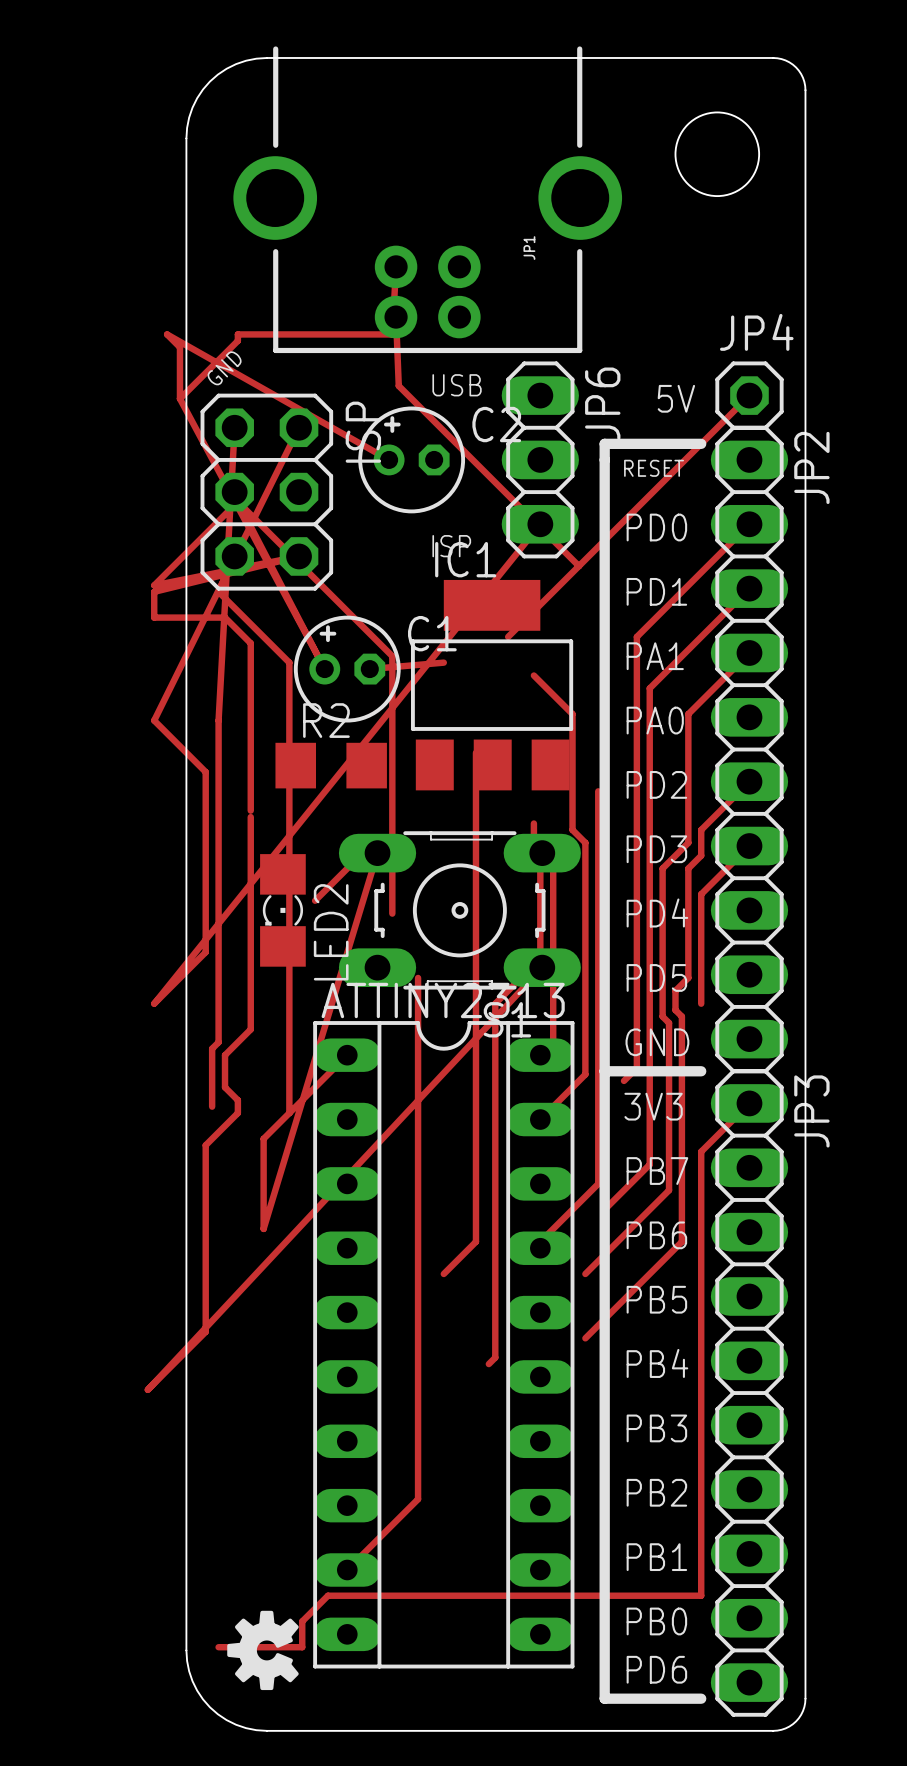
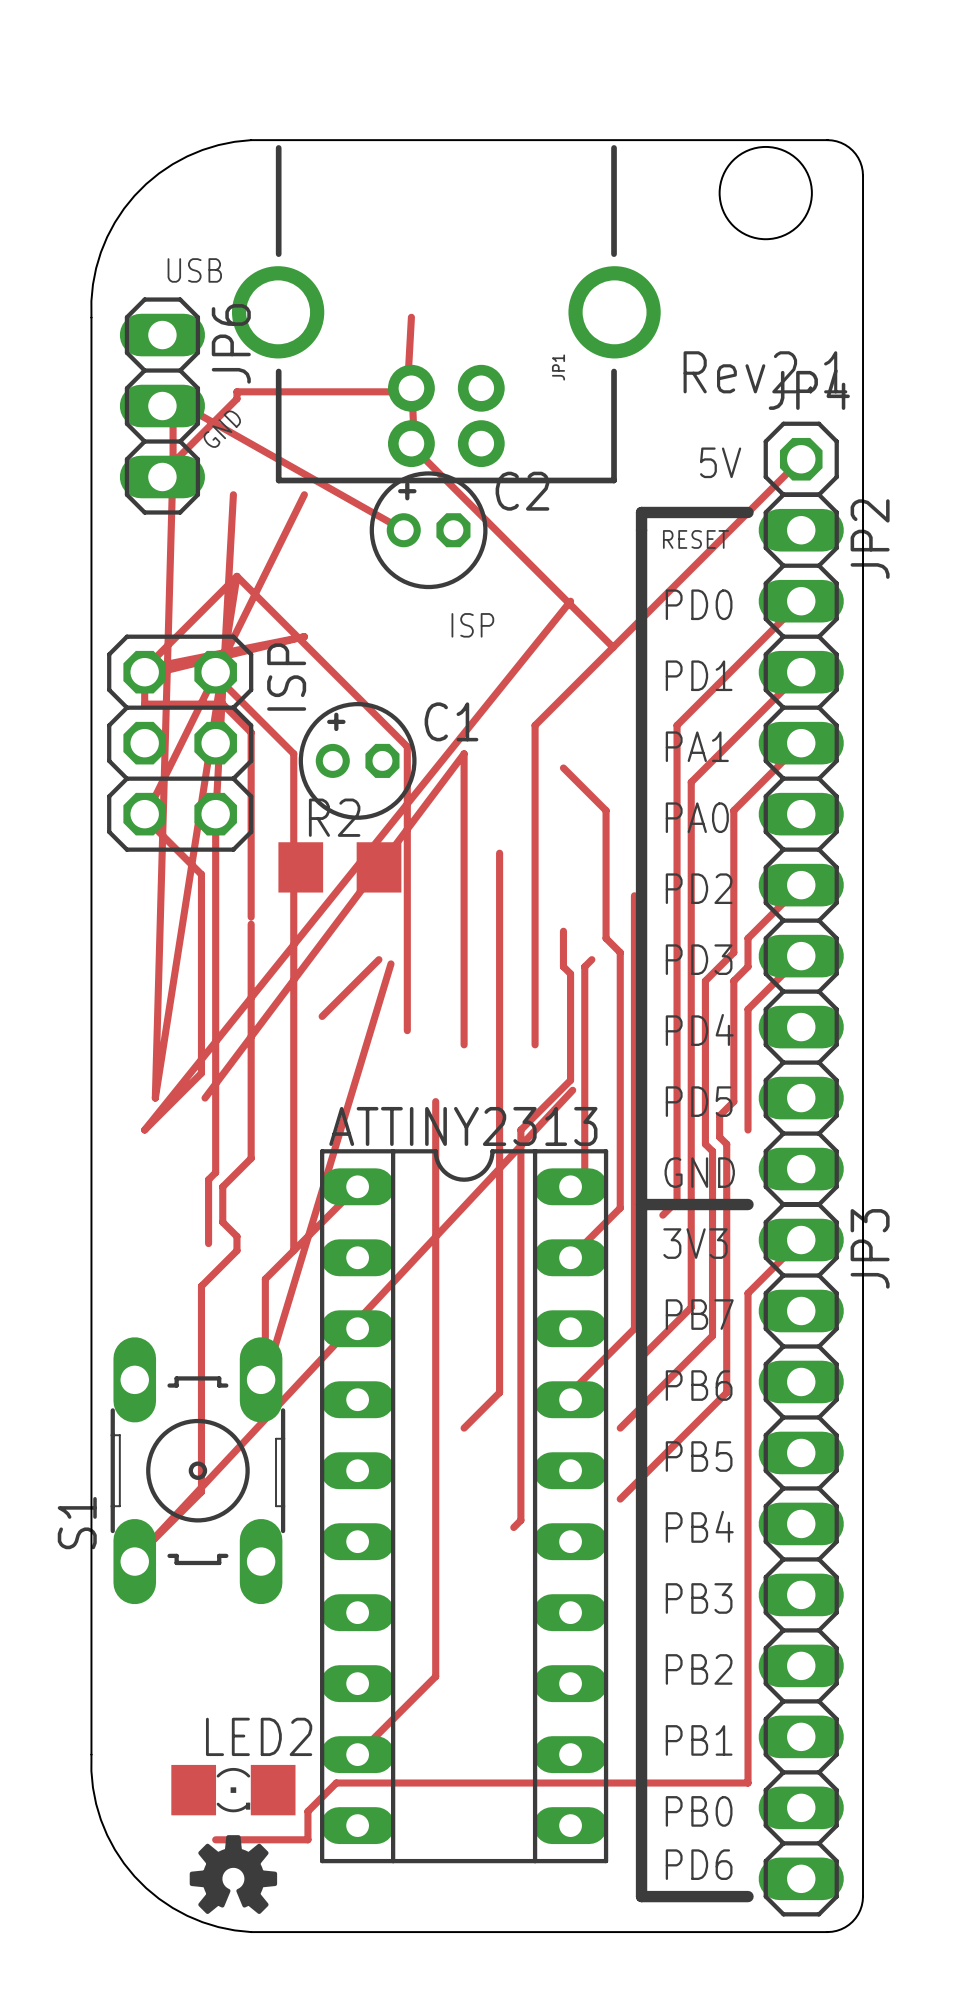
board edge: (805, 138) (805, 90) (803, 77) (798, 70) (789, 62) (773, 57) (256, 58) (236, 64) (209, 81) (197, 98) (189, 117) (186, 138) (186, 1650) (192, 1681) (209, 1707) (236, 1724) (266, 1730) -> (863, 175) (860, 162) (852, 150) (841, 142) (827, 140) (251, 140) (234, 141) (202, 149) (187, 156) (159, 173) (146, 184) (124, 208) (107, 237) (100, 252) (96, 268) (91, 301) (91, 1771) (92, 1787) (100, 1819) (114, 1849) (134, 1876) (159, 1898) (187, 1915) (218, 1927) (251, 1932) (268, 1932)
JP1 position: (427, 199) -> (446, 314)
text: none -> Rev2.1 (765, 372)
text position: USB (457, 385) -> USB (194, 270)
track: (179, 398) (324, 669) (237, 501) -> (173, 462) (155, 1098) (236, 576)
JP6 position: (540, 459) -> (162, 406)
ISP position: (266, 492) -> (180, 743)
track: none -> (535, 725) (535, 1044)
track: (443, 662) (369, 669) -> none
IC1: (492, 685) -> none
LED2 rotation: 0° (282, 910) -> 90° counterclockwise (233, 1790)
LED2 position: (282, 910) -> (233, 1790)
S1 rotation: 0° (459, 910) -> 90° clockwise (197, 1470)
S1 position: (459, 910) -> (197, 1470)
track: none -> (464, 1044) (464, 753) (205, 1098)
drawing: [227, 1610, 299, 1691] -> none
drawing: none -> [189, 1835, 278, 1914]

